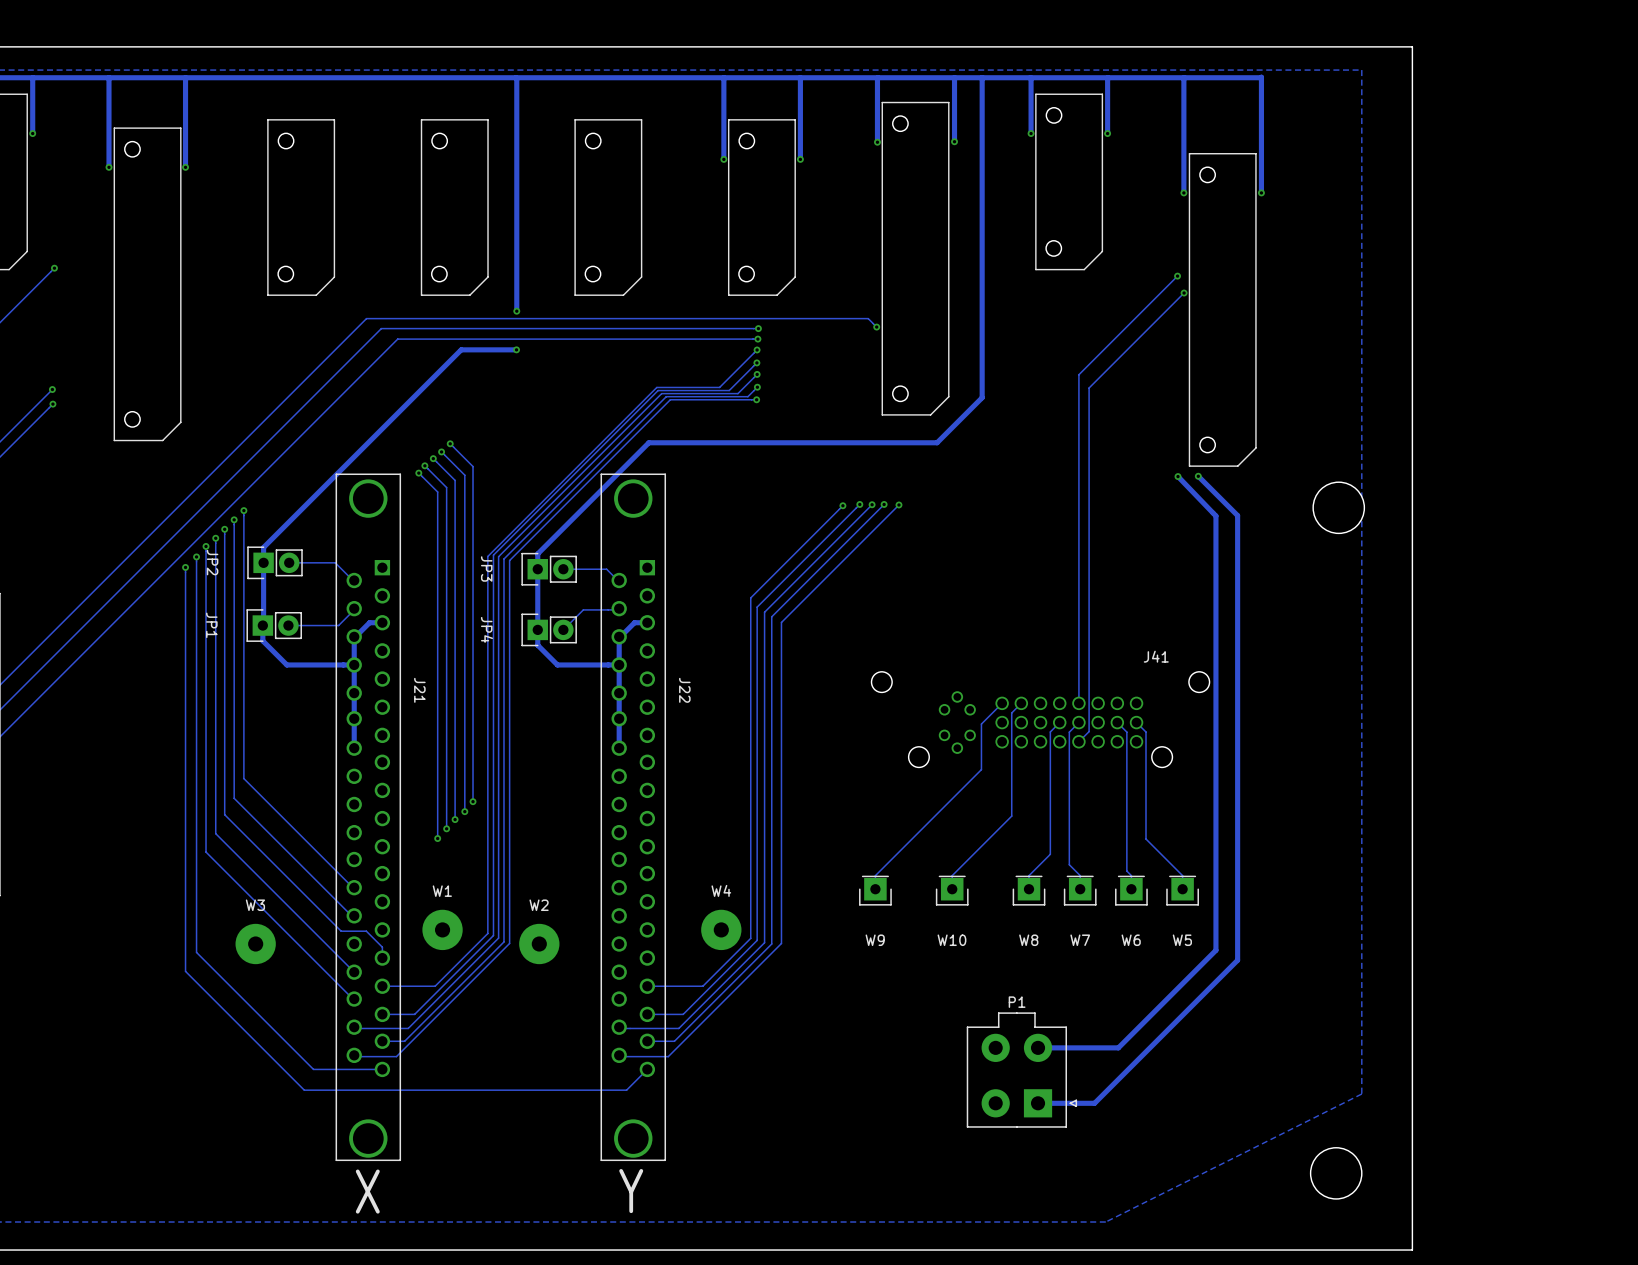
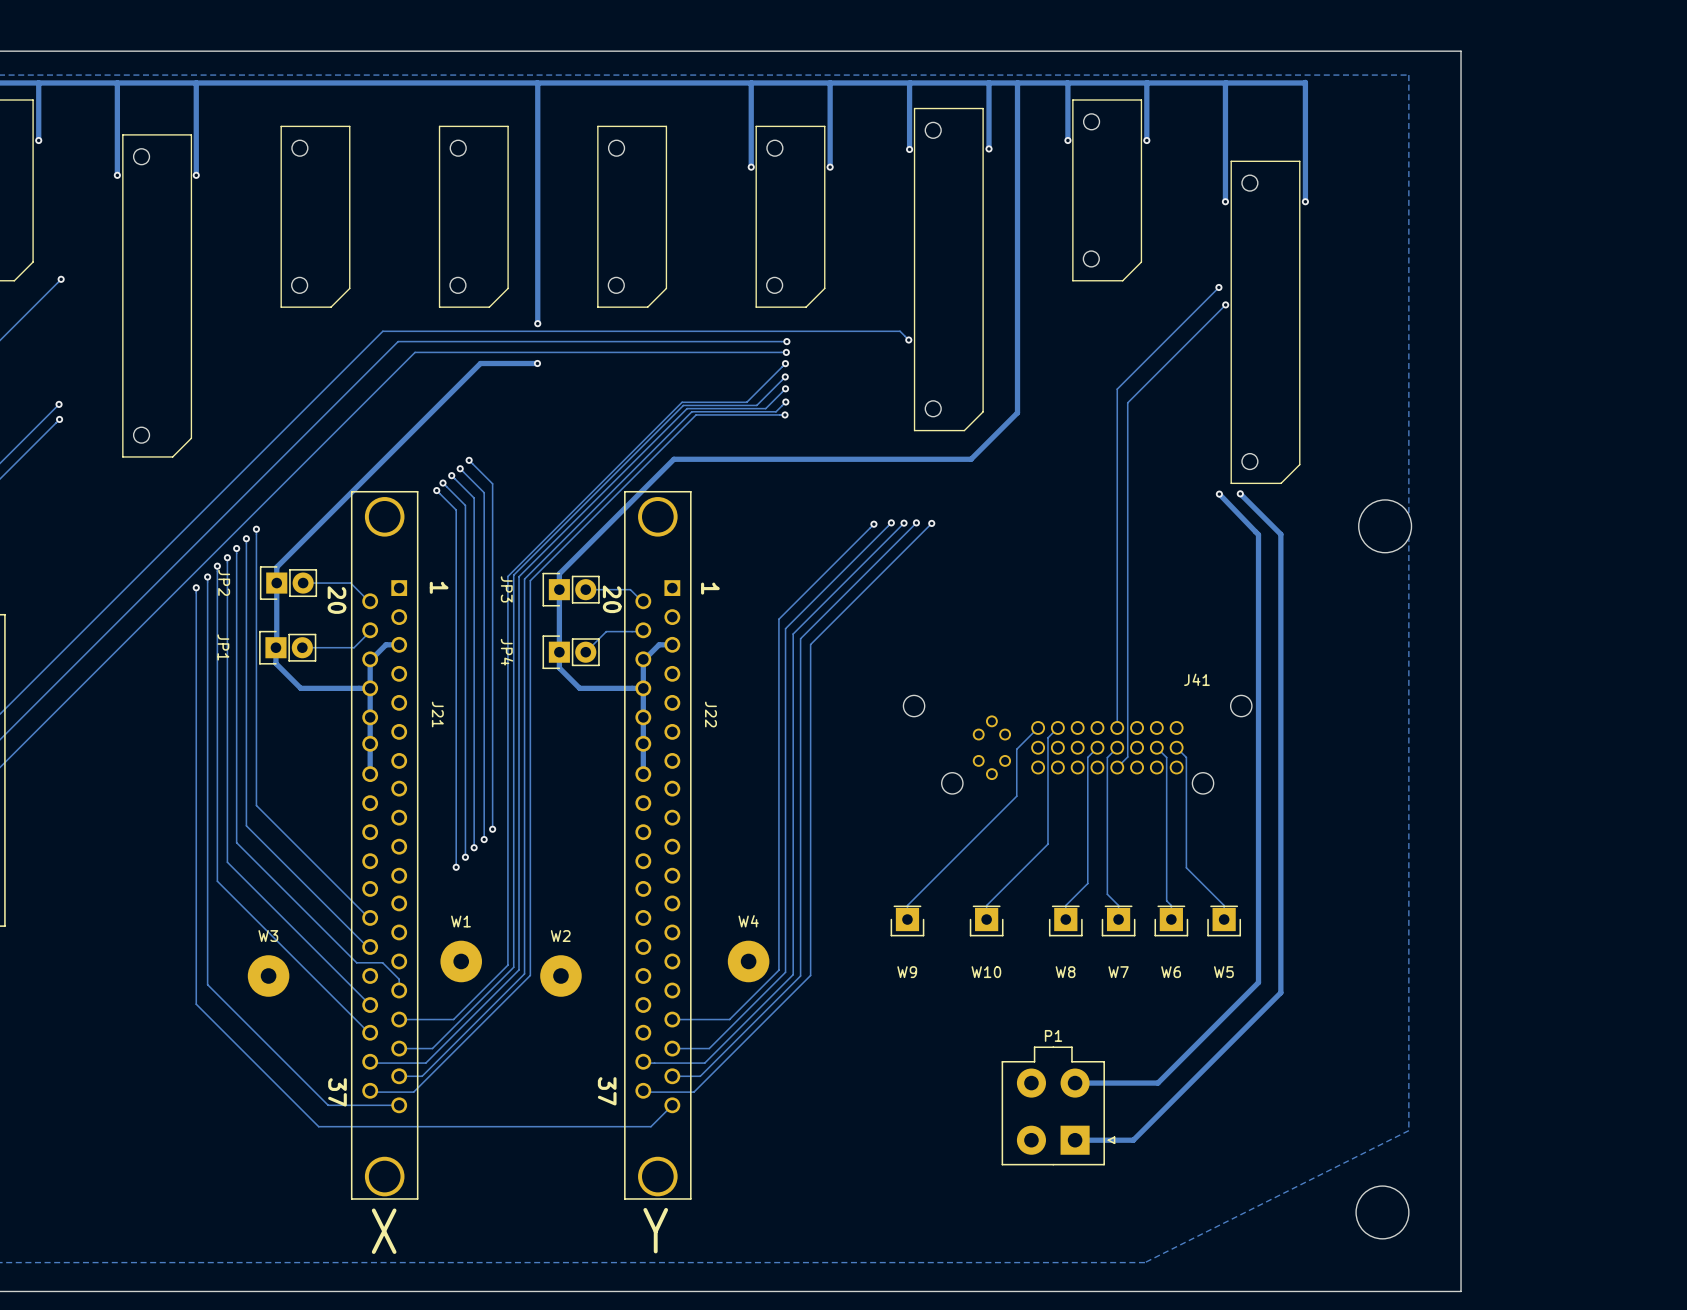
text: none -> 1 (439, 587)
text: none -> 1 (710, 588)
text: none -> 20 (612, 599)
text: none -> 20 (336, 600)
text: none -> 37 (607, 1091)
text: none -> 37 (337, 1092)

